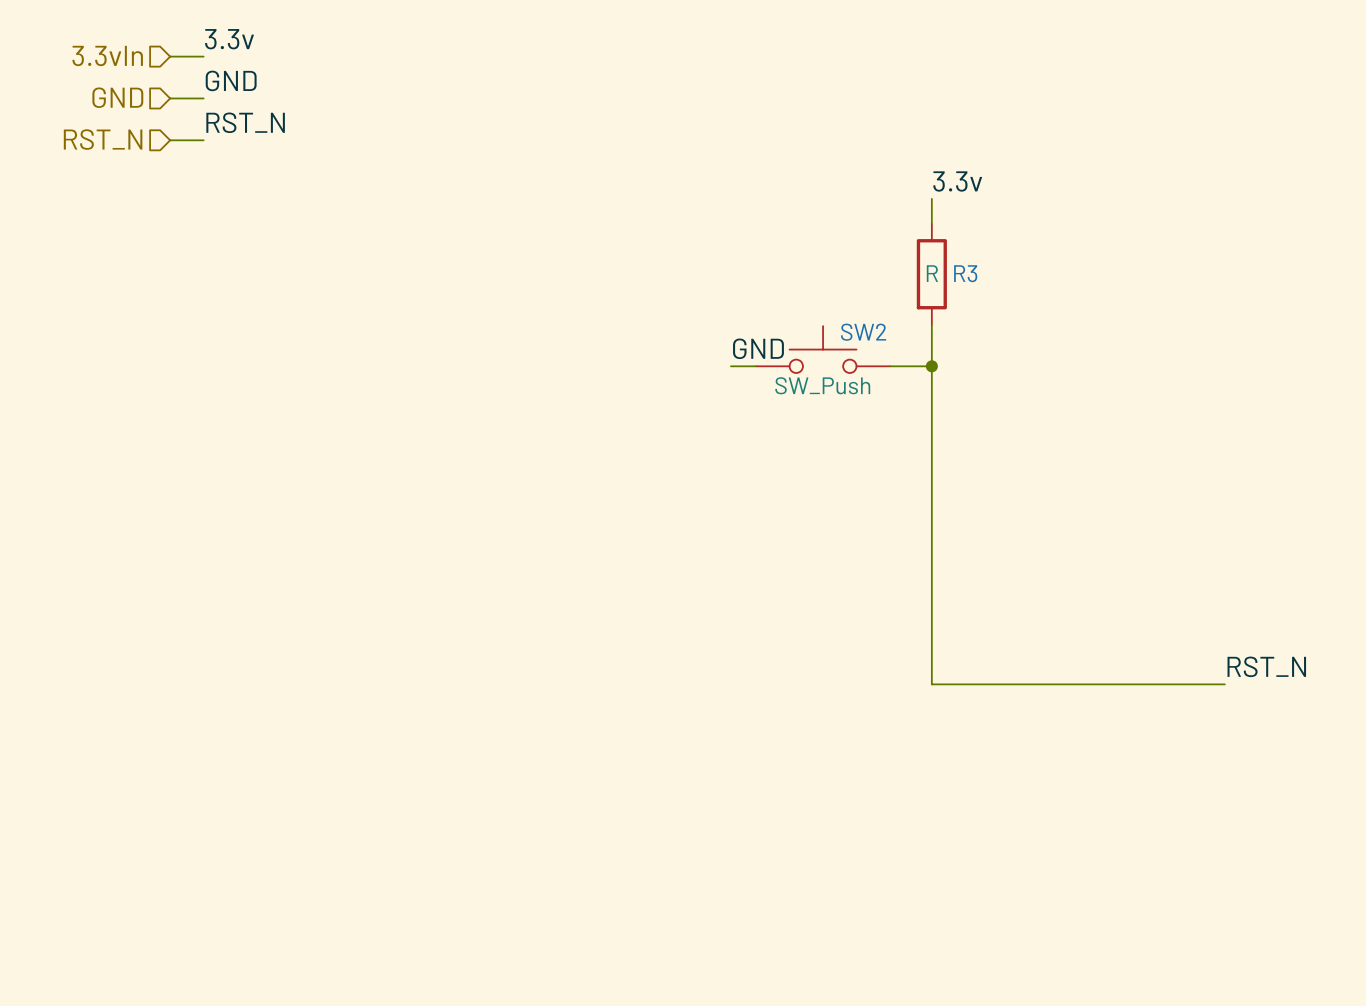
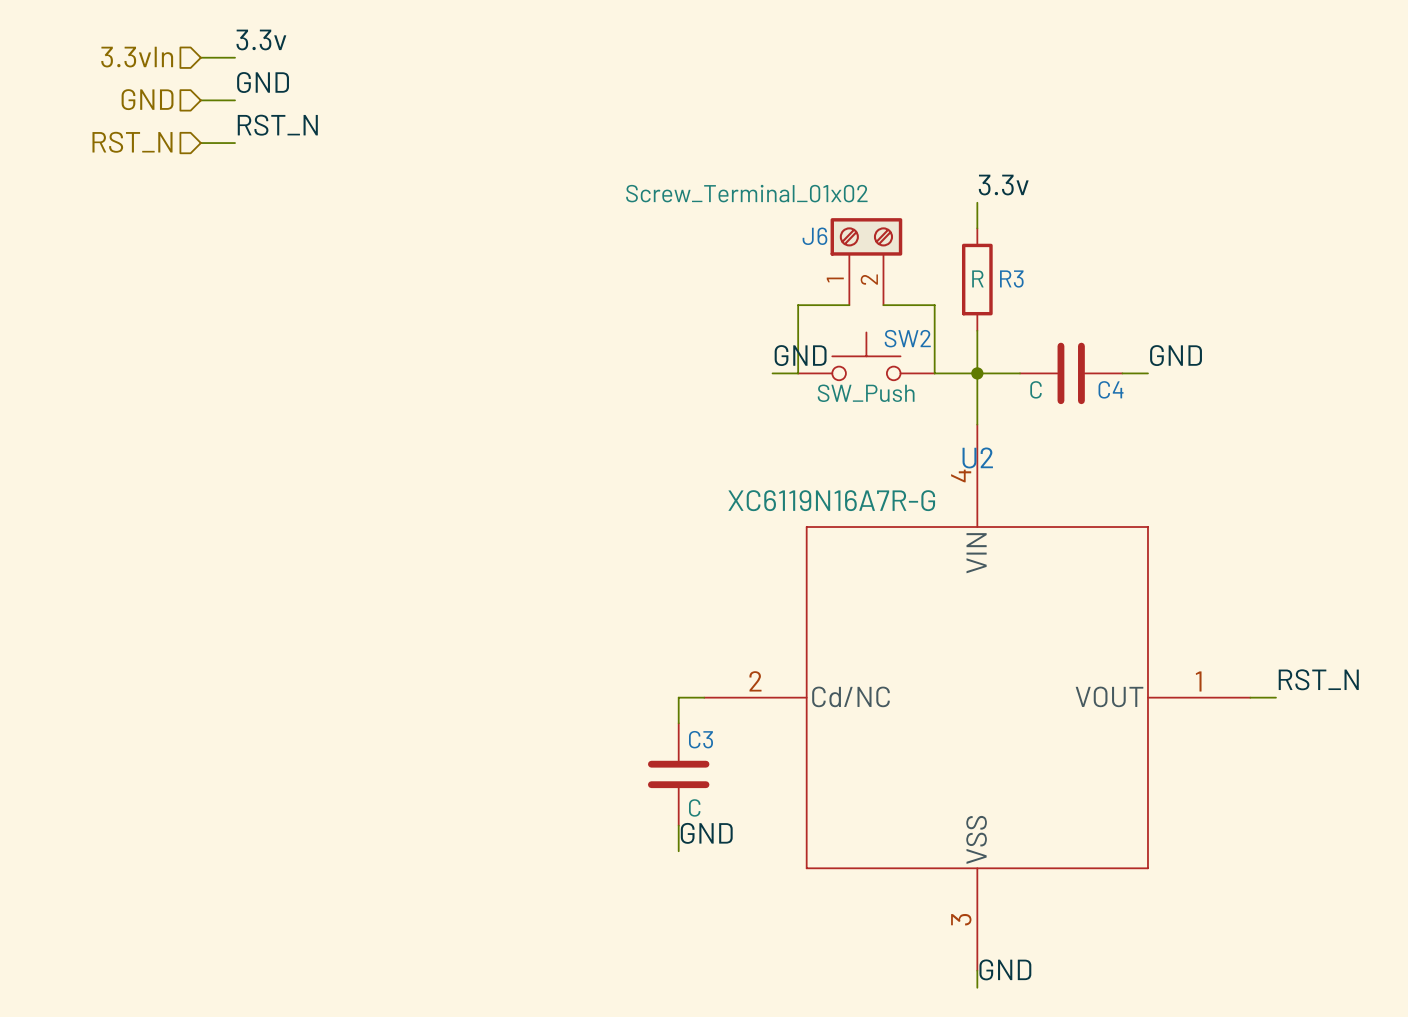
J6: none -> Screw_Terminal_01x02 (866, 261)
wire: none -> (849, 305) (798, 305) (798, 373)
wire: none -> (883, 305) (934, 305) (934, 373)
label: none -> GND (1176, 355)
wire: none -> (977, 373) (1020, 373)
C4: none -> C (1071, 373)
wire: none -> (1122, 373) (1147, 373)
wire: (931, 416) (931, 684) (1199, 684) -> none
wire: none -> (704, 697) (678, 697) (678, 723)
U2: none -> XC6119N16A7R-G (977, 697)
C3: none -> C (678, 774)
wire: none -> (678, 825) (678, 851)
label: none -> GND (706, 833)
label: none -> GND (1005, 969)
wire: none -> (977, 970) (977, 987)

